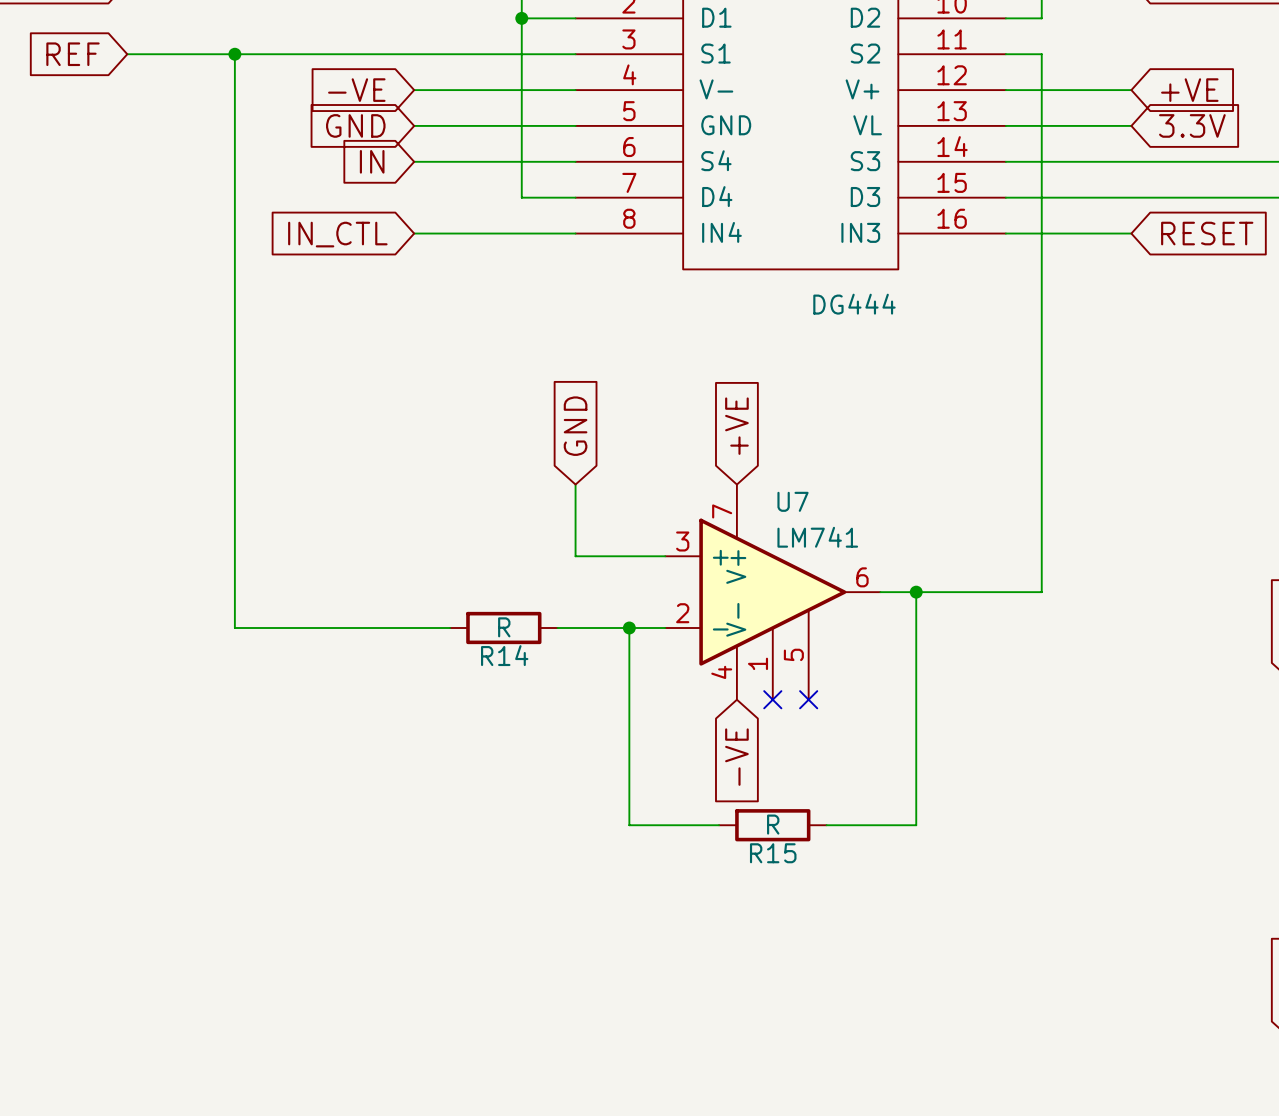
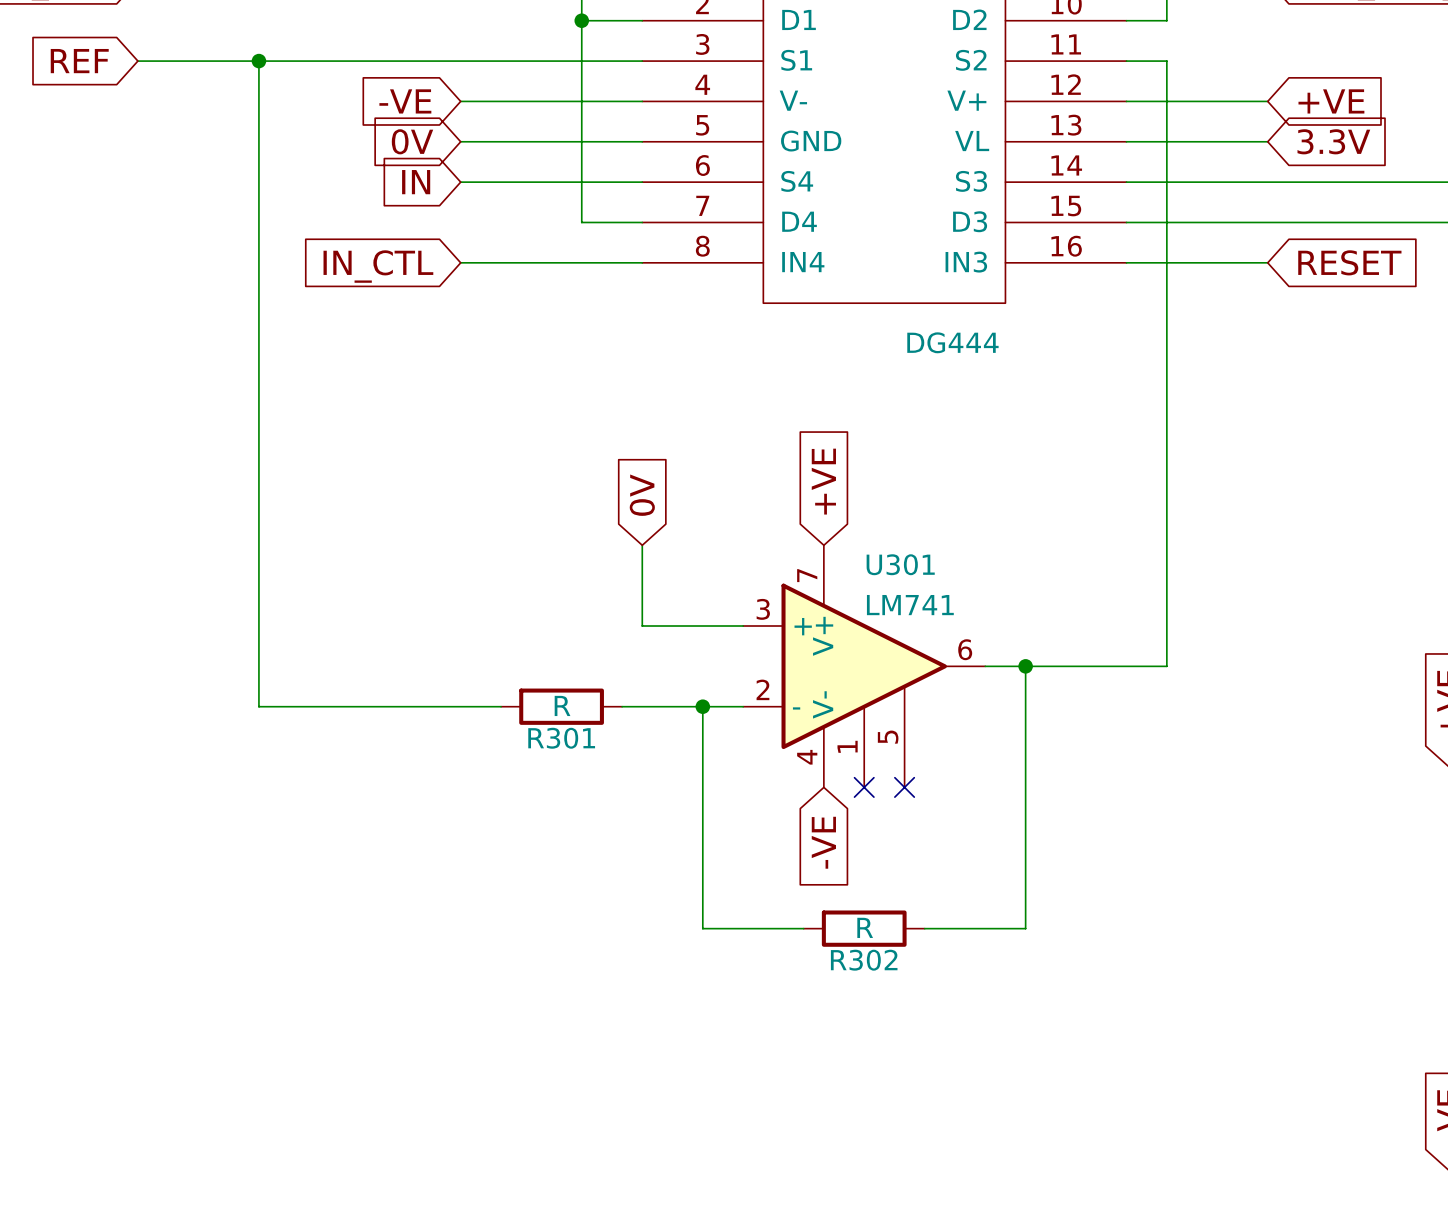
global label: GND (355, 125) -> 0V (412, 141)
global label: GND (575, 426) -> 0V (642, 495)
U7 name: U7 (793, 501) -> U301 (900, 564)
R14 name: R14 (504, 655) -> R301 (561, 738)
R15 name: R15 (773, 853) -> R302 (864, 960)

